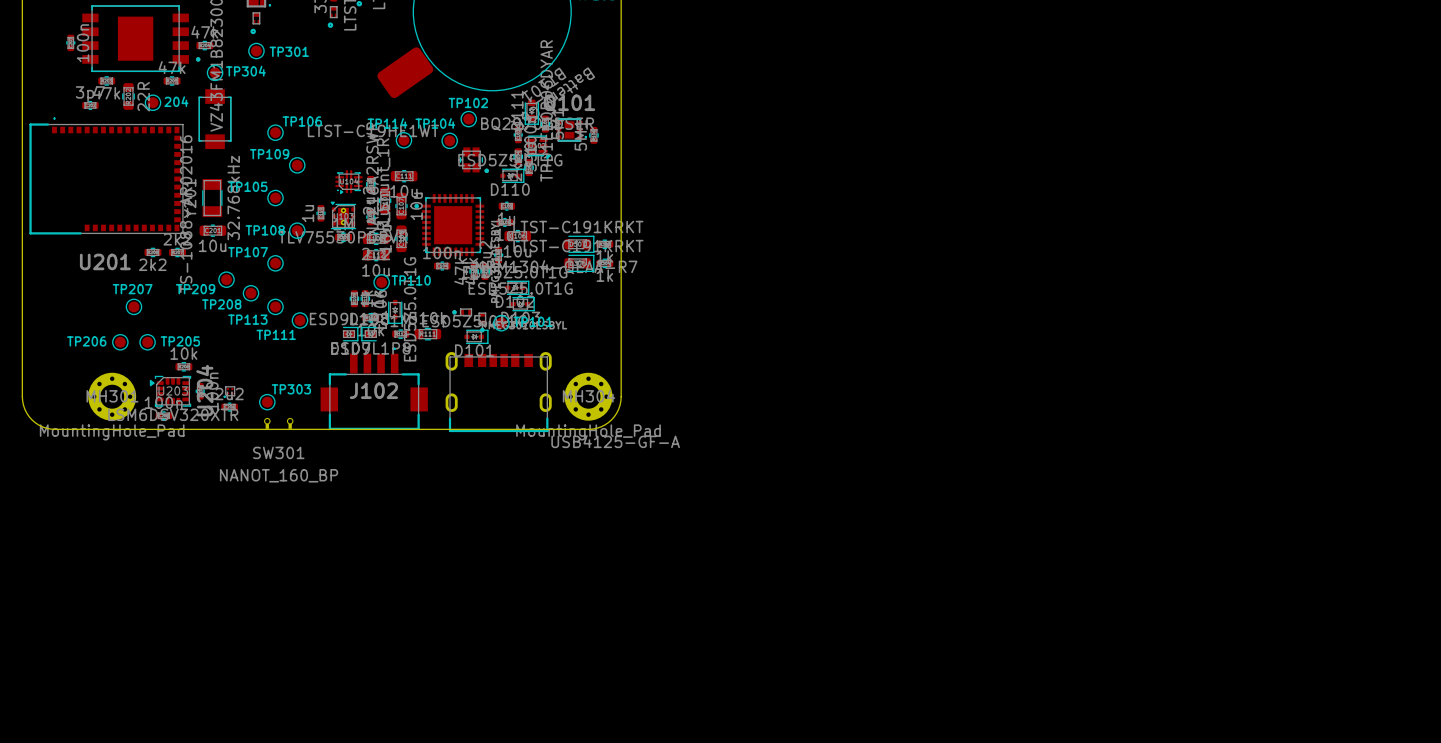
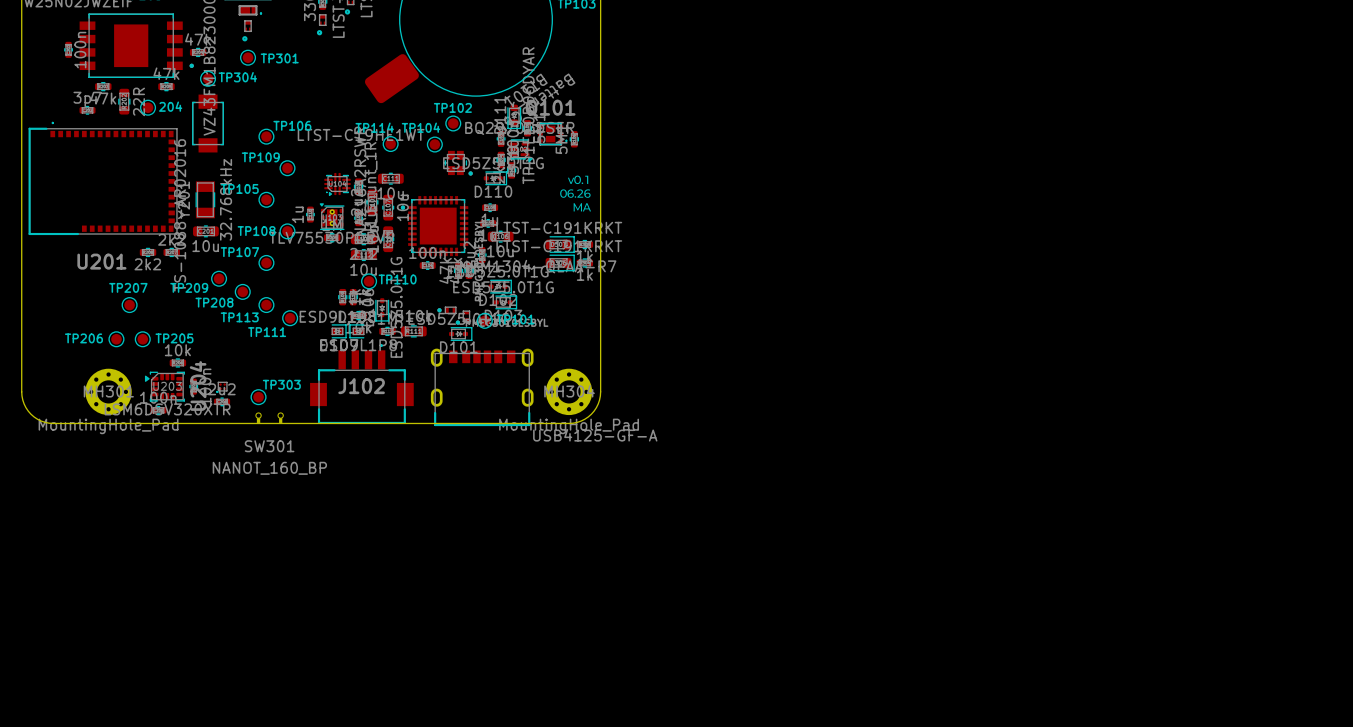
drawing: none -> [560, 175, 592, 212]
part footprint: [478, 312, 487, 333] -> [455, 310, 471, 325]

